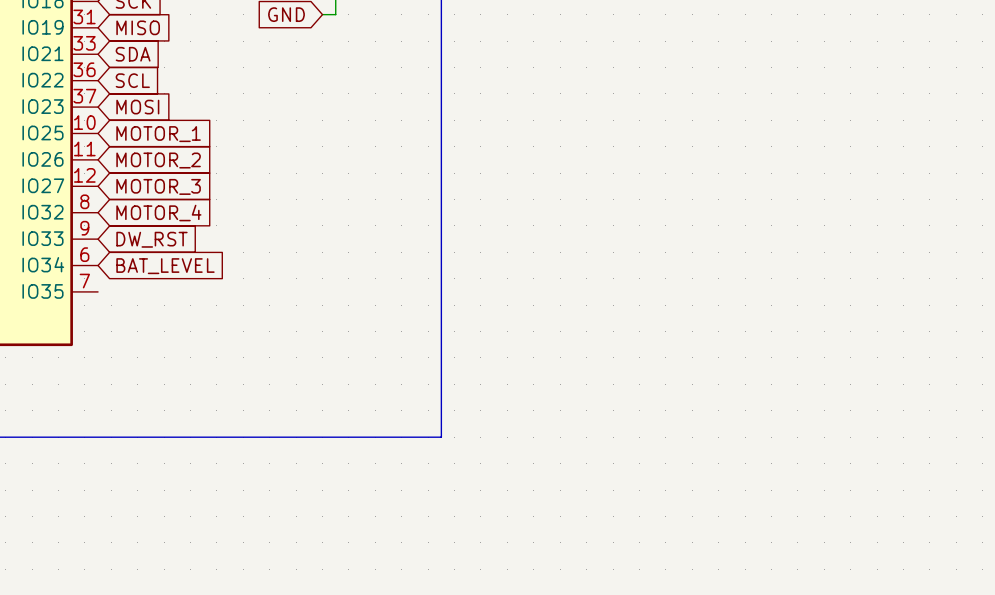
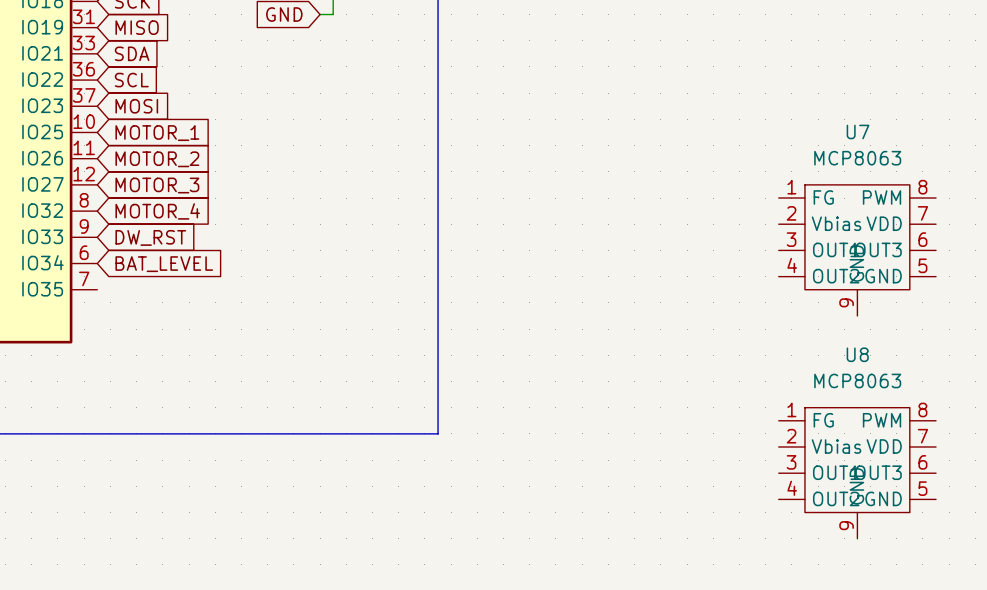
U7: none -> MCP8063 (857, 250)
U8: none -> MCP8063 (857, 473)

